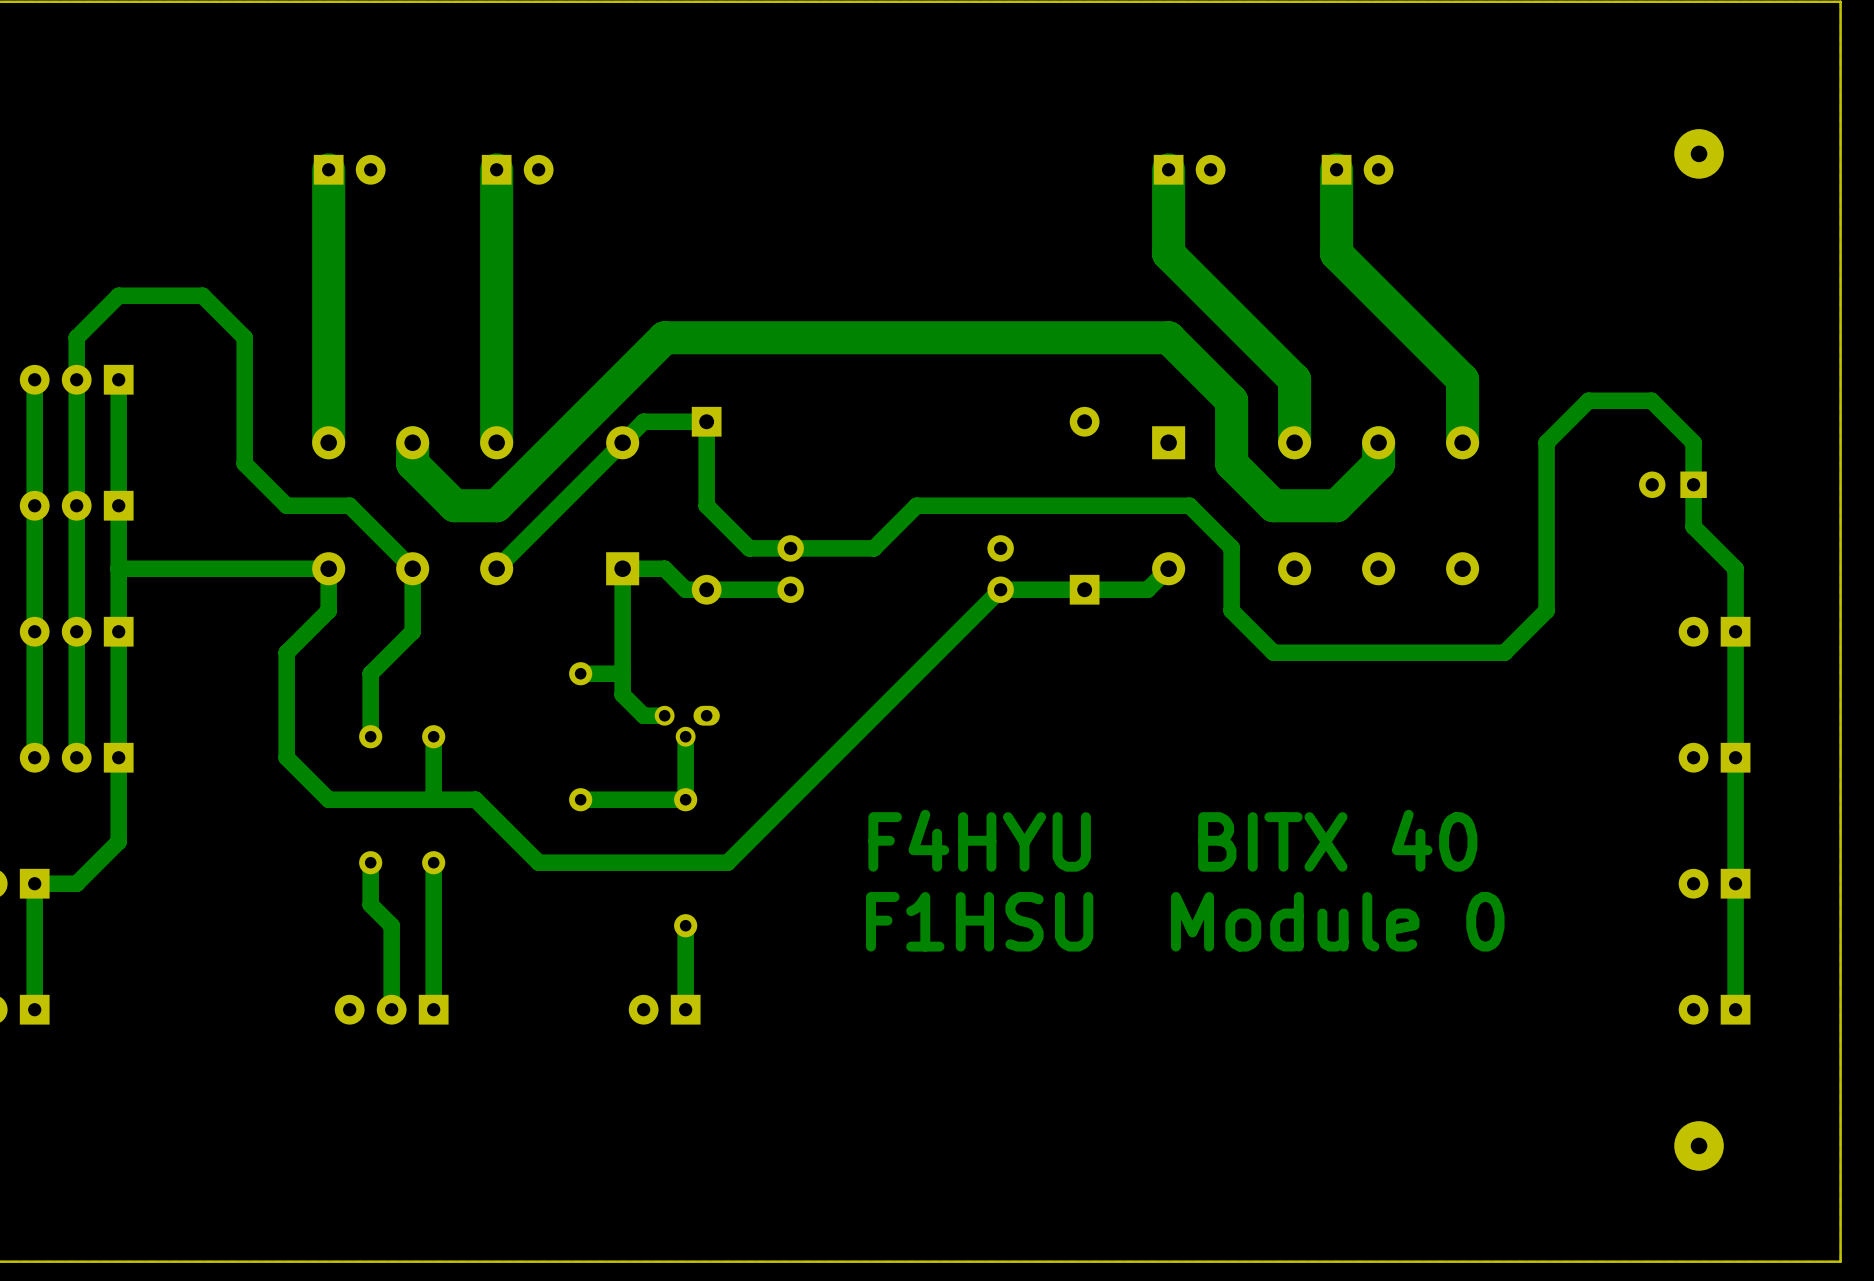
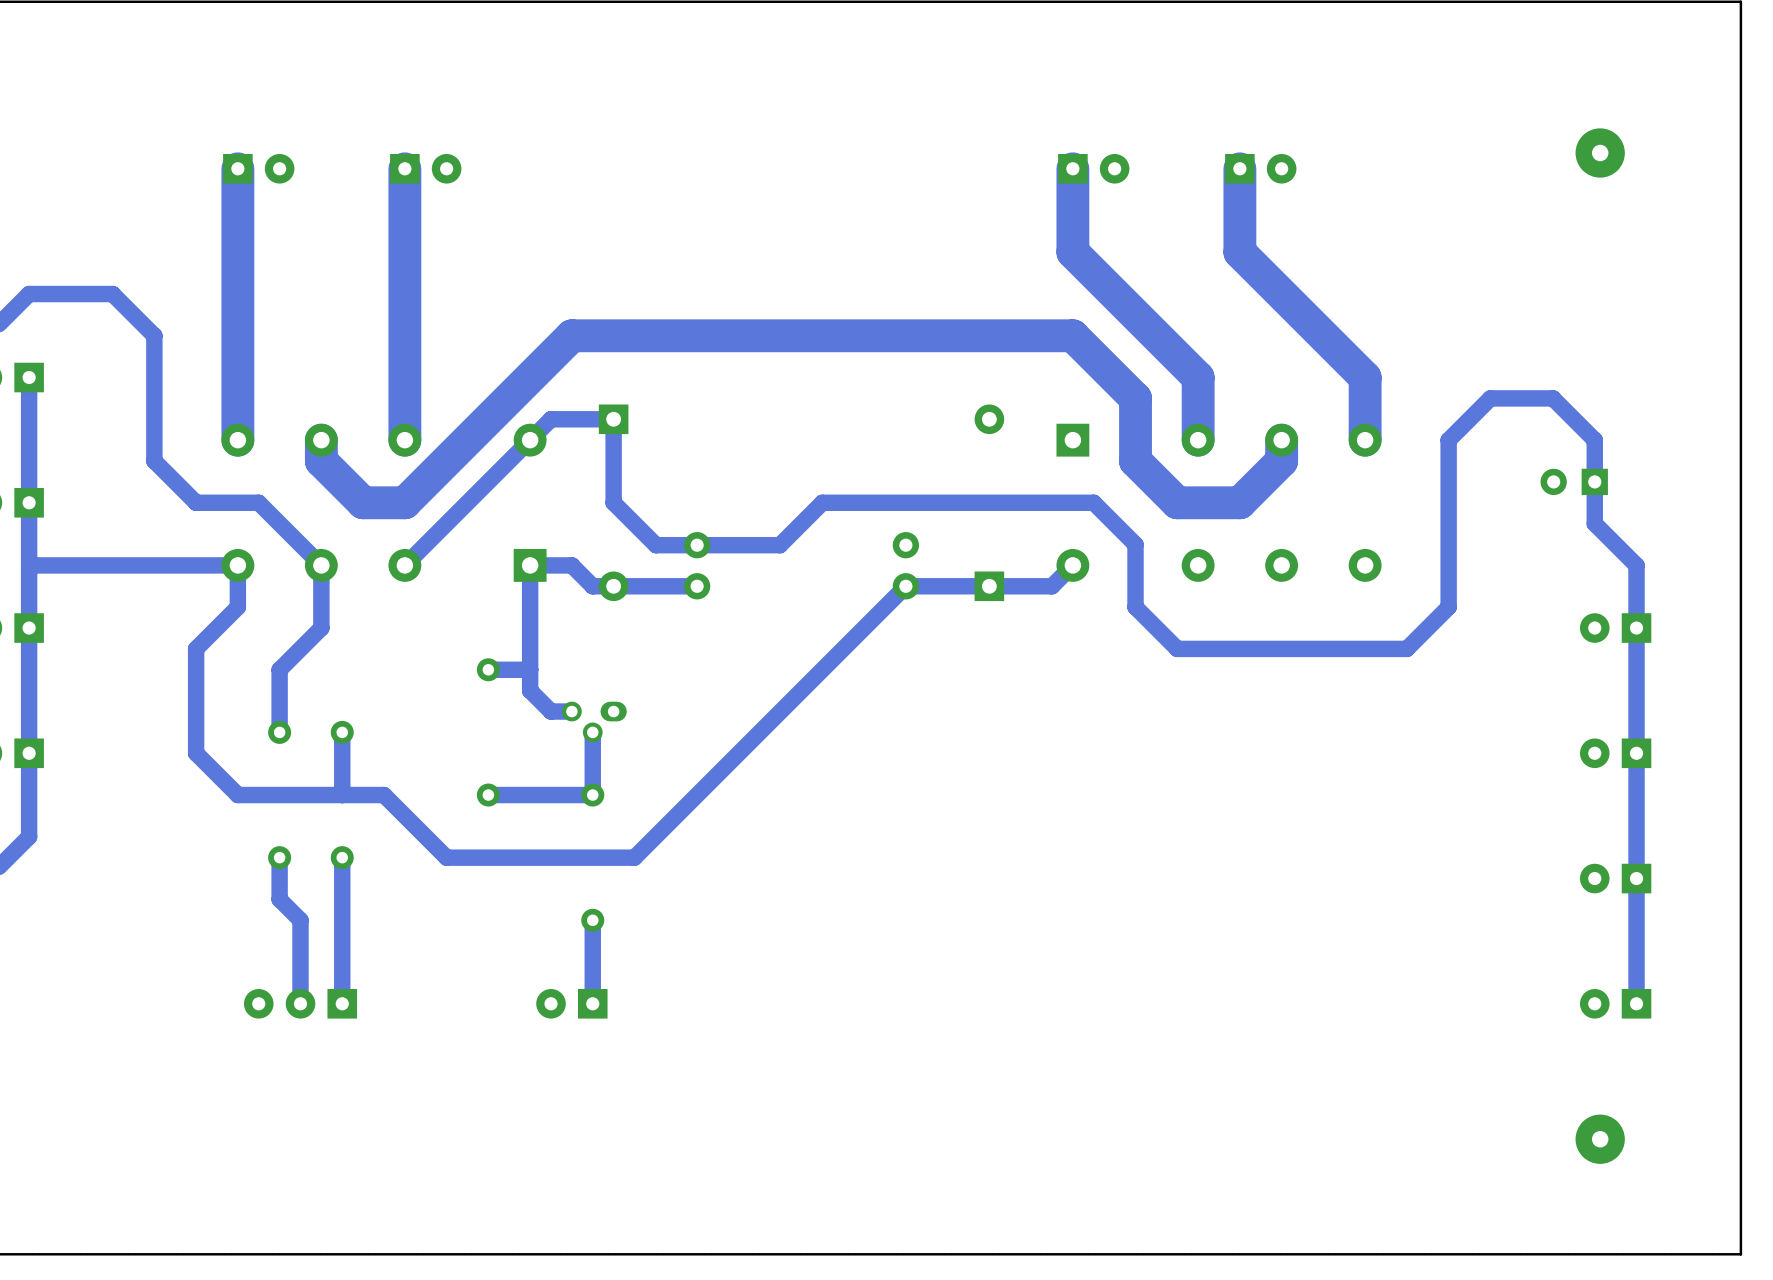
text: F4HYU (979, 840) -> none
text: BITX 40 (1337, 840) -> none
text: F1HSU (979, 921) -> none
text: Module 0 (1337, 921) -> none

